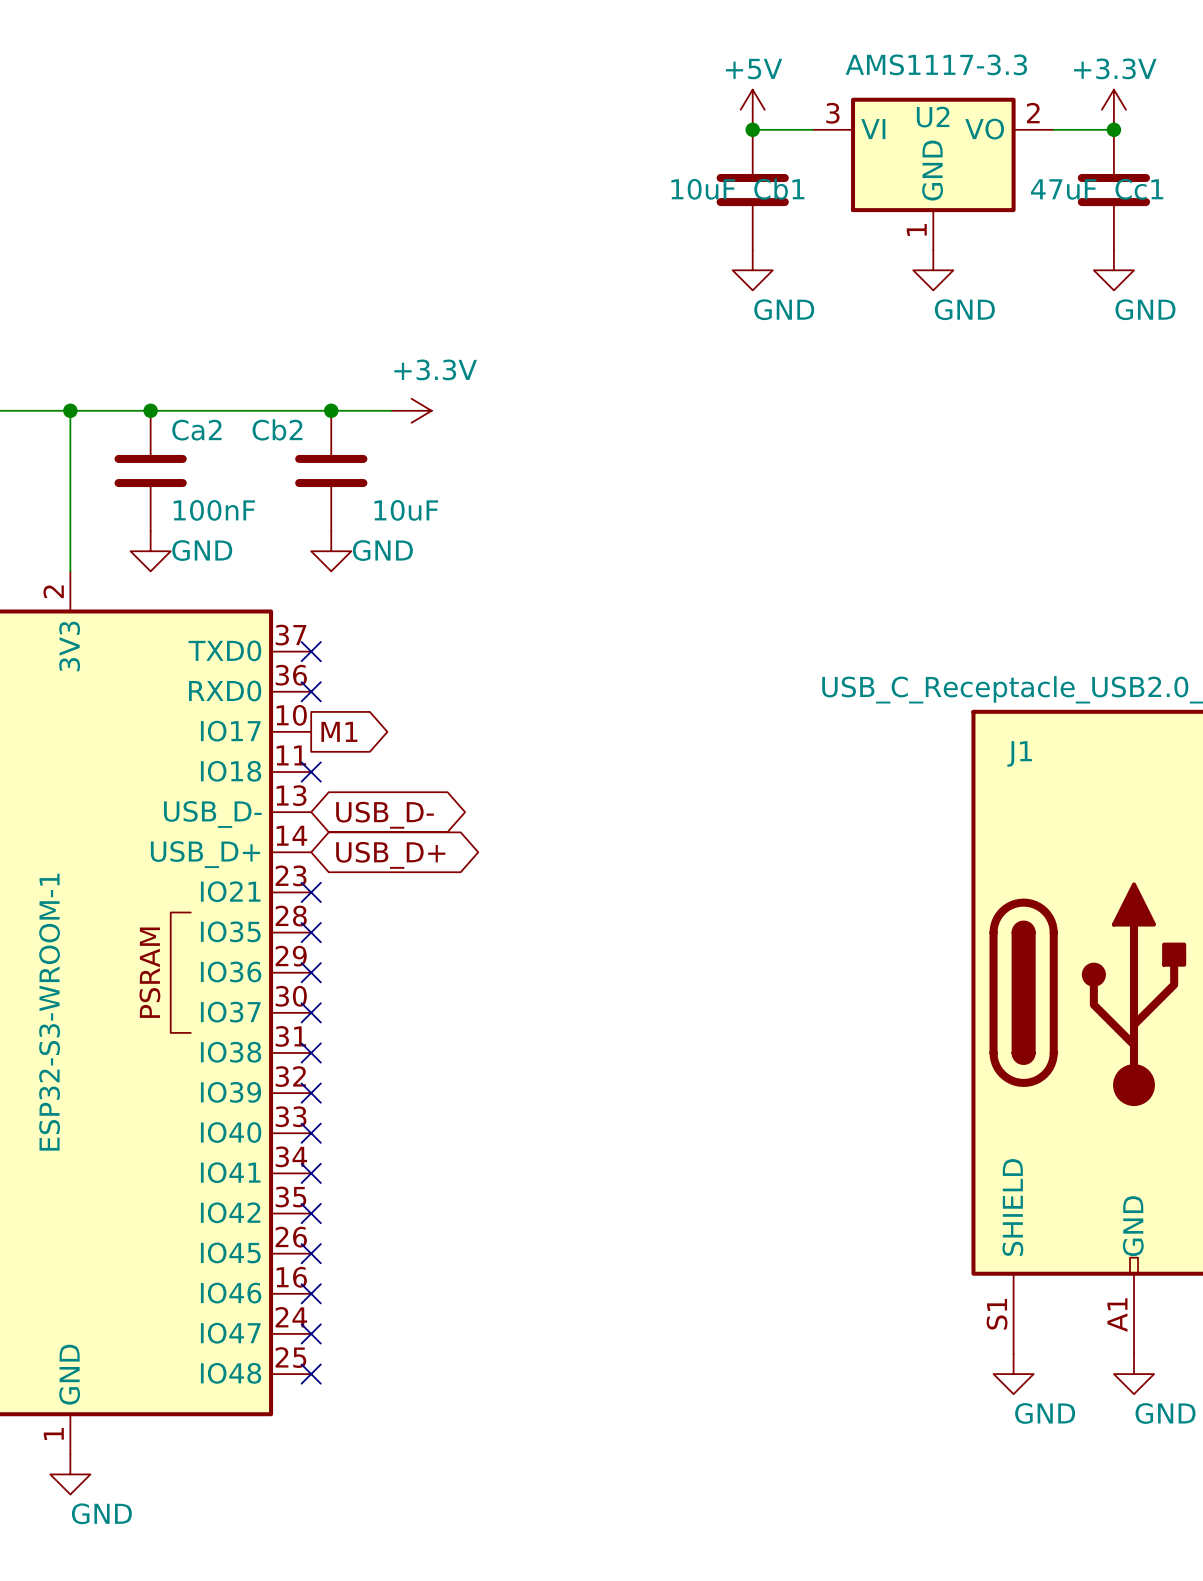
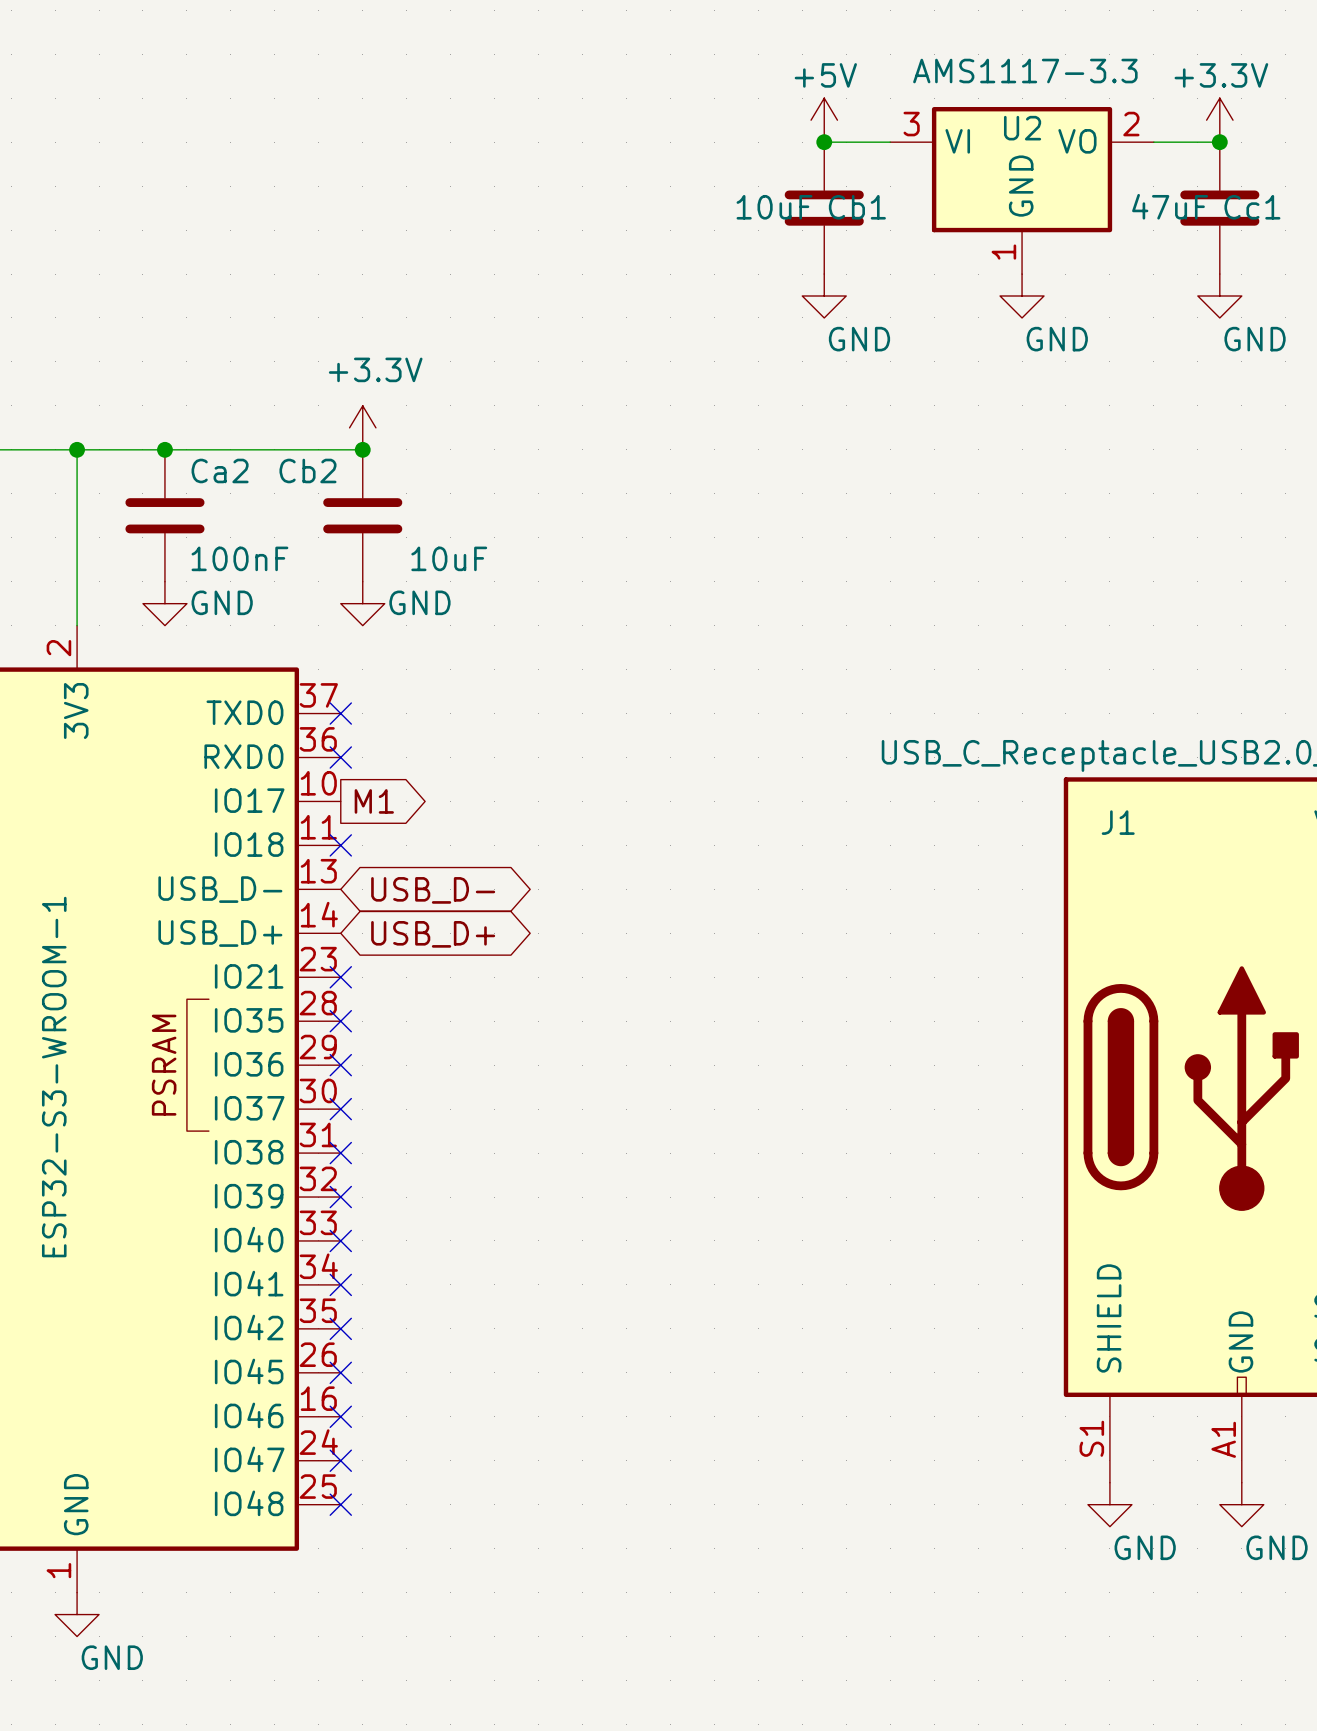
wire: (331, 410) (391, 410) -> none
power symbol rotation: 0° (411, 410) -> 90° counterclockwise (362, 427)
power symbol position: +3.3V (411, 410) -> +3.3V (362, 427)

